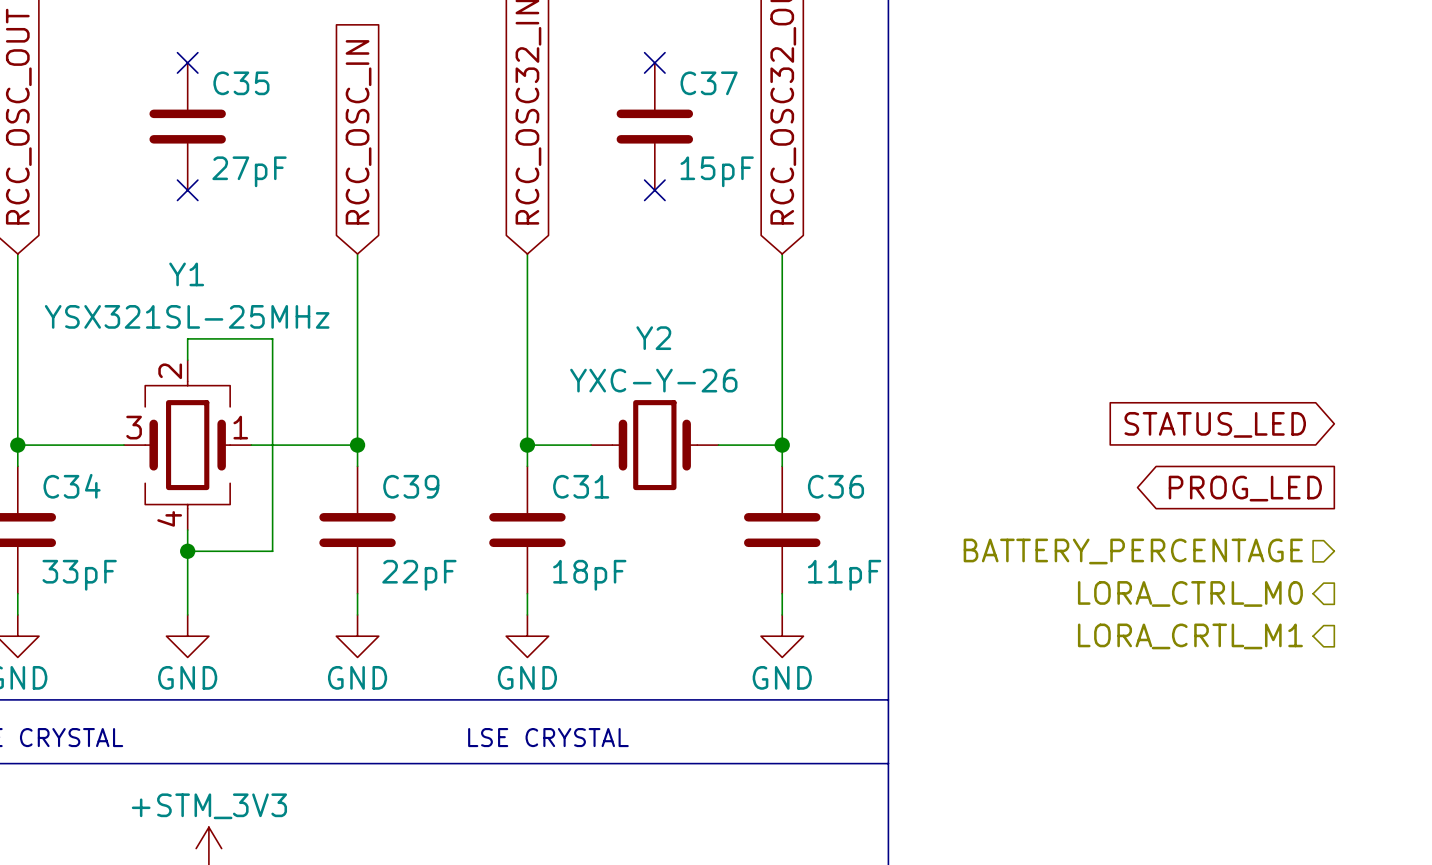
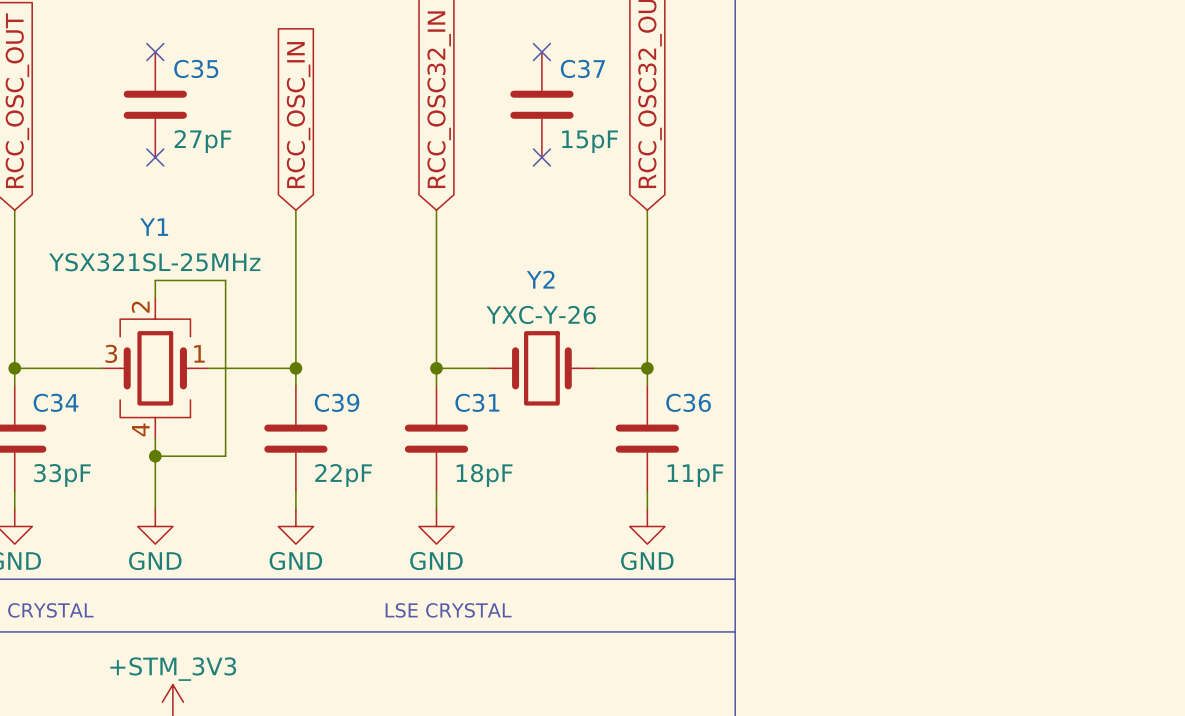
global label: STATUS_LED (1215, 424) -> none
global label: PROG_LED (1245, 488) -> none
hierarchical label: BATTERY_PERCENTAGE (1133, 551) -> none
hierarchical label: LORA_CTRL_M0 (1190, 593) -> none
hierarchical label: LORA_CRTL_M1 (1190, 636) -> none

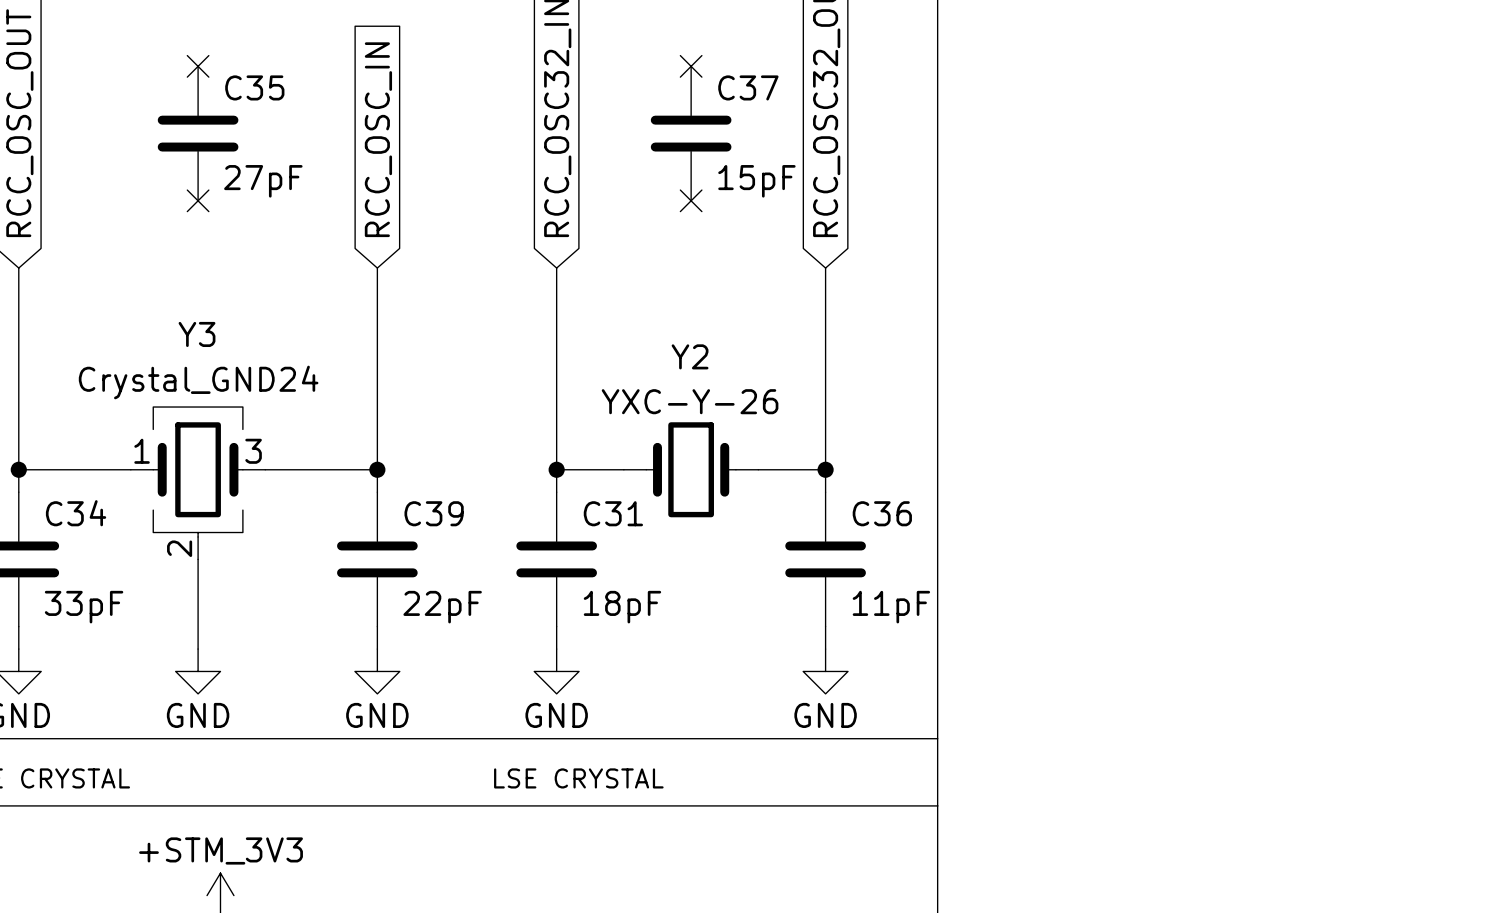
wire: (155, 298) (155, 280) (225, 280) (225, 456) (155, 456) -> none
Y1: YSX321SL-25MHz (155, 368) -> none
Y3: none -> Crystal_GND24 (198, 483)
junction: (155, 456) -> none

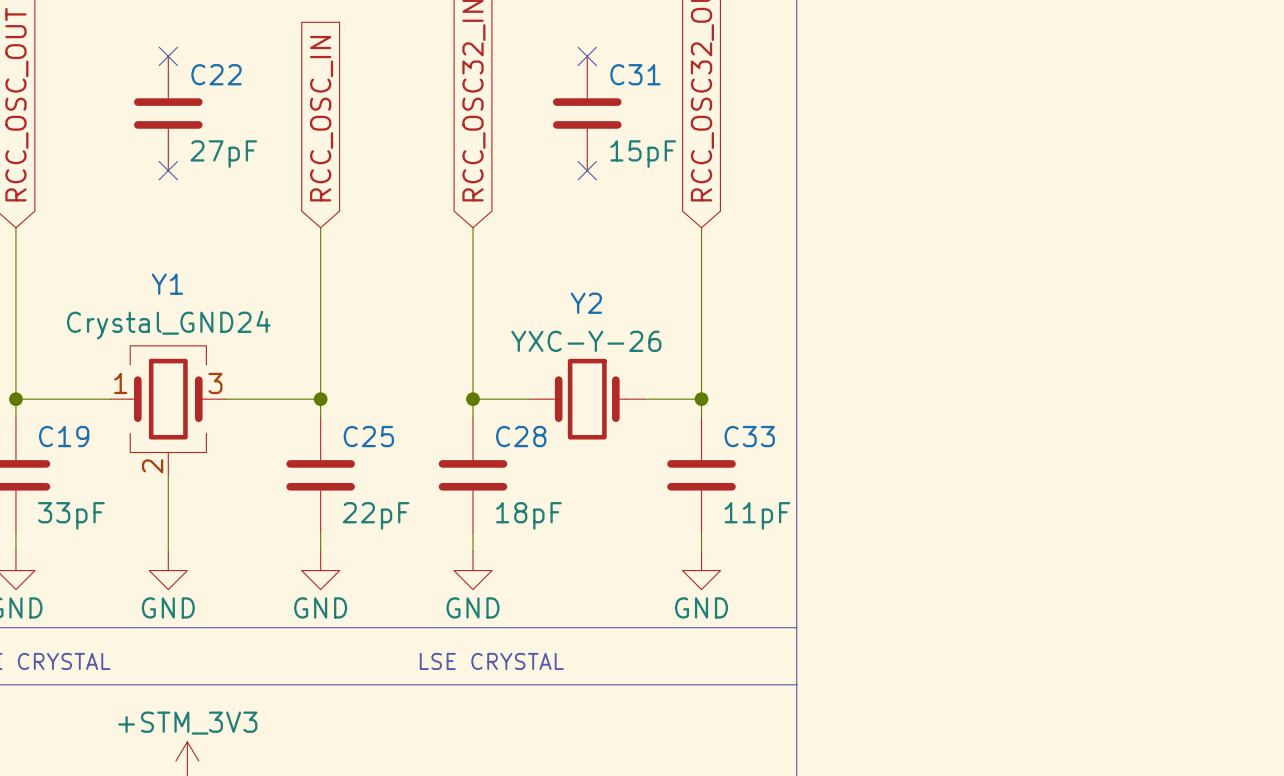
C35 name: C35 (254, 87) -> C22 (216, 74)
C37 name: C37 (748, 87) -> C31 (635, 74)
Y3 name: Y3 (197, 334) -> Y1 (167, 284)
C34 name: C34 (76, 513) -> C19 (64, 436)
C39 name: C39 (434, 513) -> C25 (368, 436)
C31 name: C31 (613, 513) -> C28 (521, 436)
C36 name: C36 (882, 513) -> C33 (749, 436)

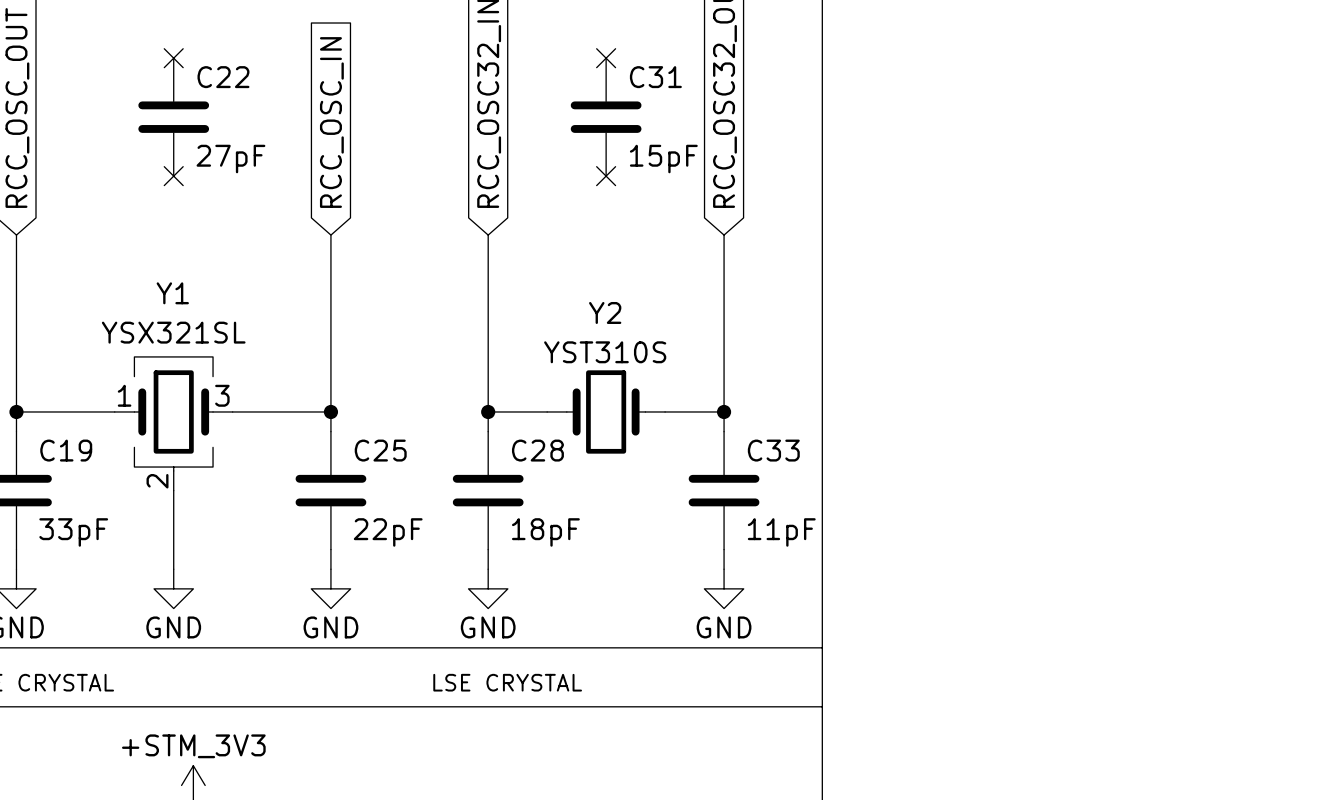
Y1 value: Crystal_GND24 (168, 325) -> YSX321SL (173, 332)
Y2 value: YXC-Y-26 (586, 341) -> YST310S (605, 352)

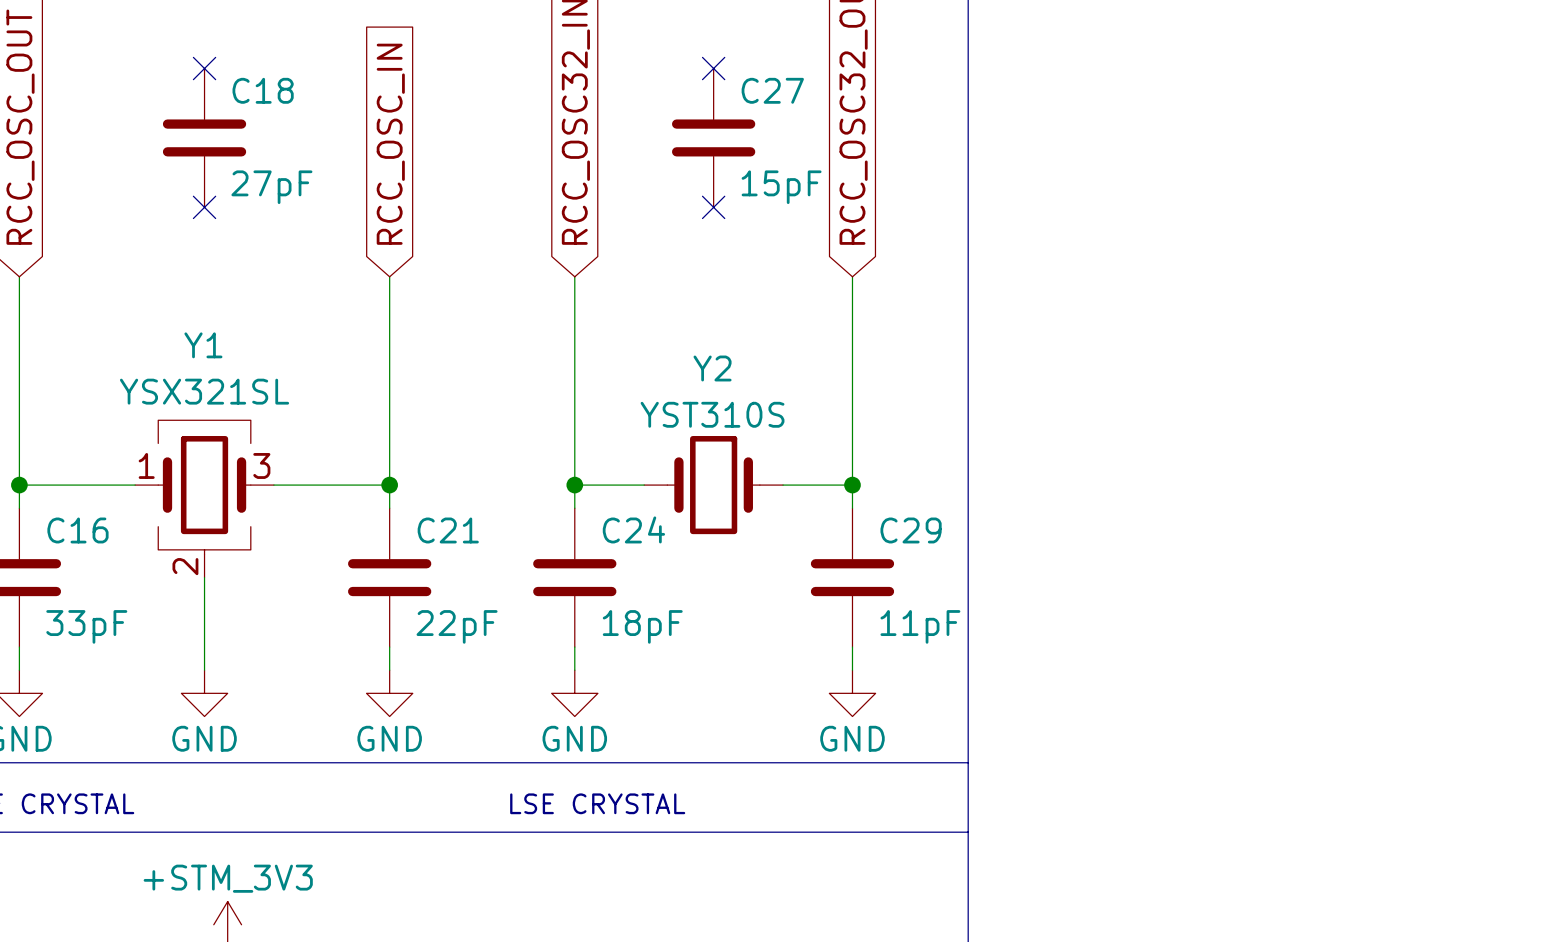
C22 name: C22 (223, 77) -> C18 (263, 90)
C31 name: C31 (655, 77) -> C27 (772, 90)
C19 name: C19 (66, 450) -> C16 (77, 530)
C25 name: C25 (380, 450) -> C21 (448, 530)
C28 name: C28 (537, 450) -> C24 (633, 529)
C33 name: C33 (773, 450) -> C29 (911, 530)

